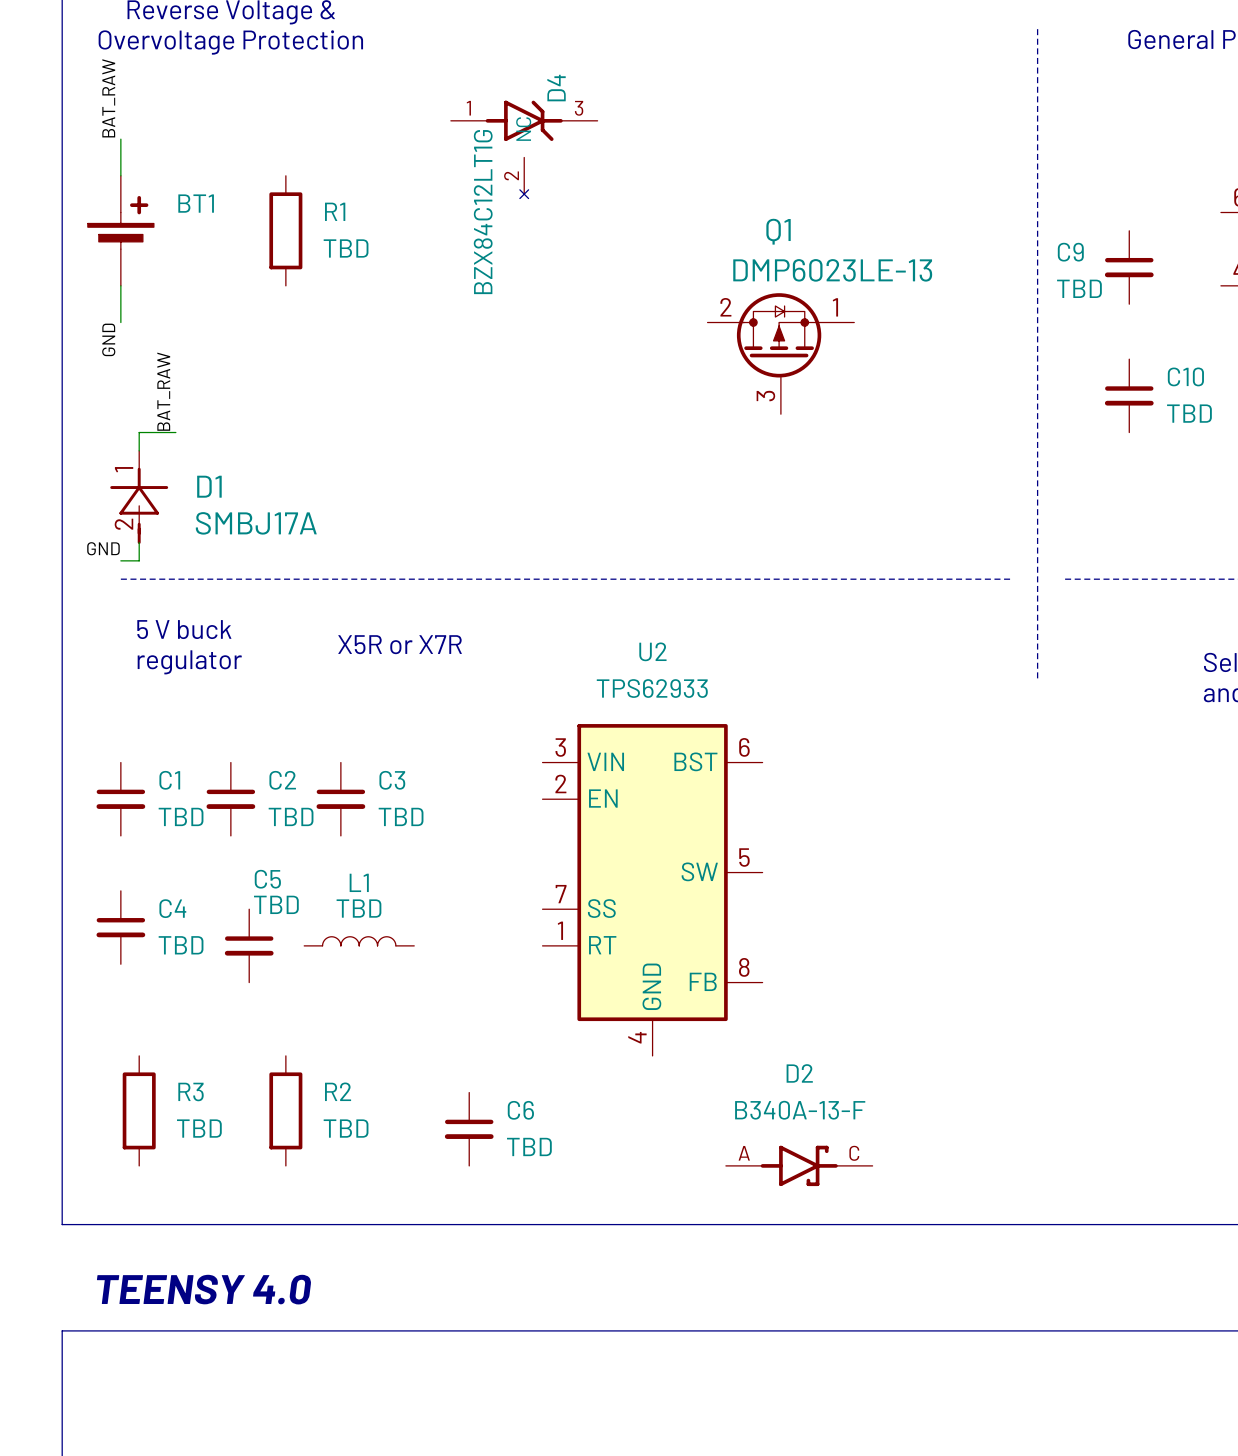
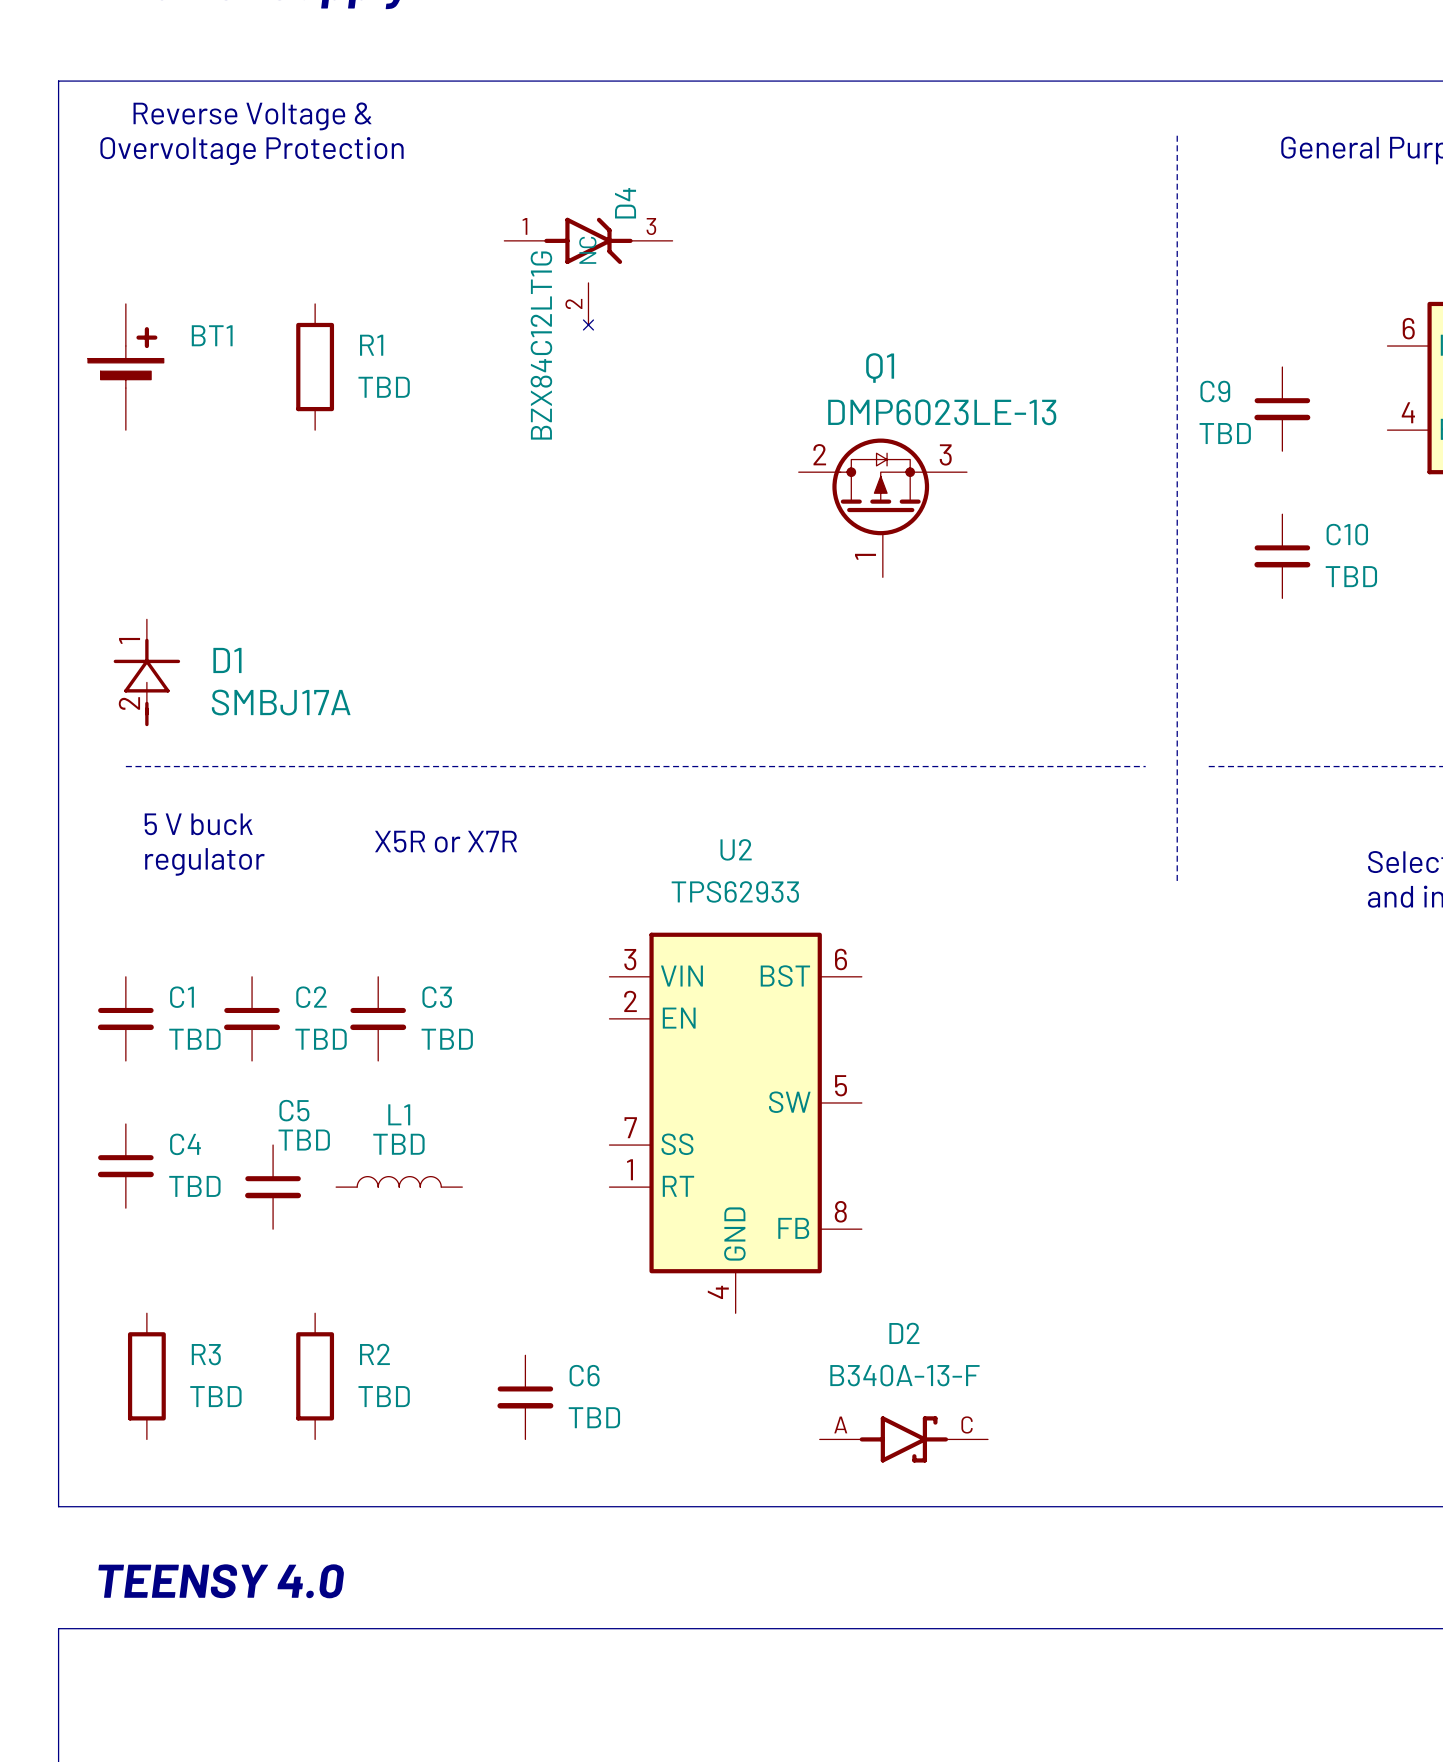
label: BAT_RAW (108, 98) -> none
wire: (120, 139) (120, 175) -> none
wire: (120, 285) (120, 322) -> none
Q1 pin number: 1 (835, 307) -> 3 (945, 454)
label: GND (108, 339) -> none
label: BAT_RAW (163, 391) -> none
Q1 pin number: 3 (765, 396) -> 1 (865, 556)
wire: (175, 432) (139, 432) (139, 450) -> none
wire: (139, 542) (139, 560) (120, 560) -> none
label: GND (103, 548) -> none

